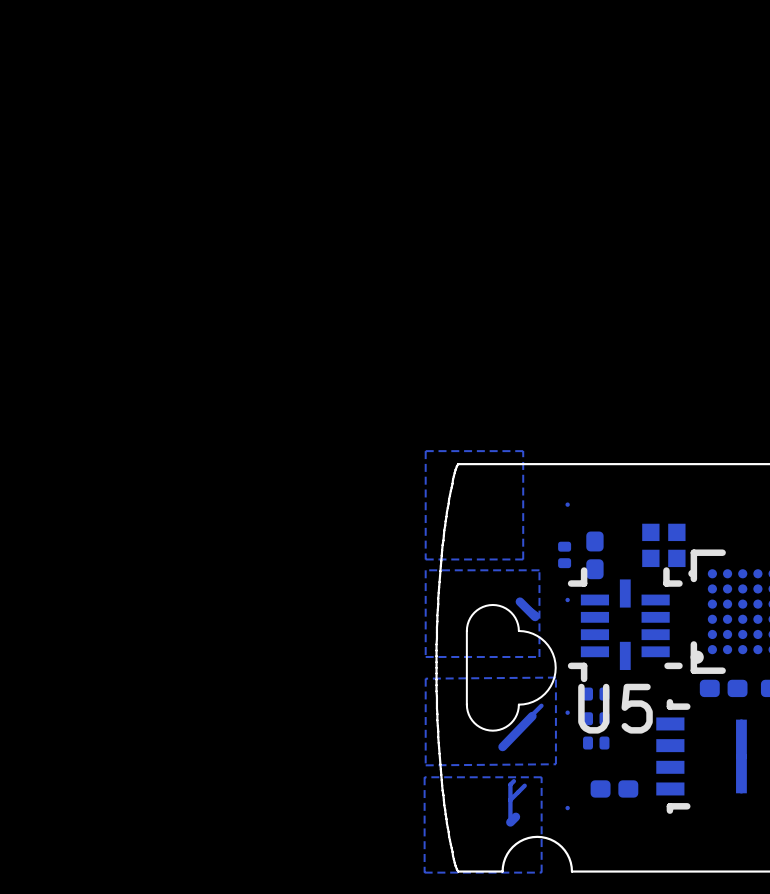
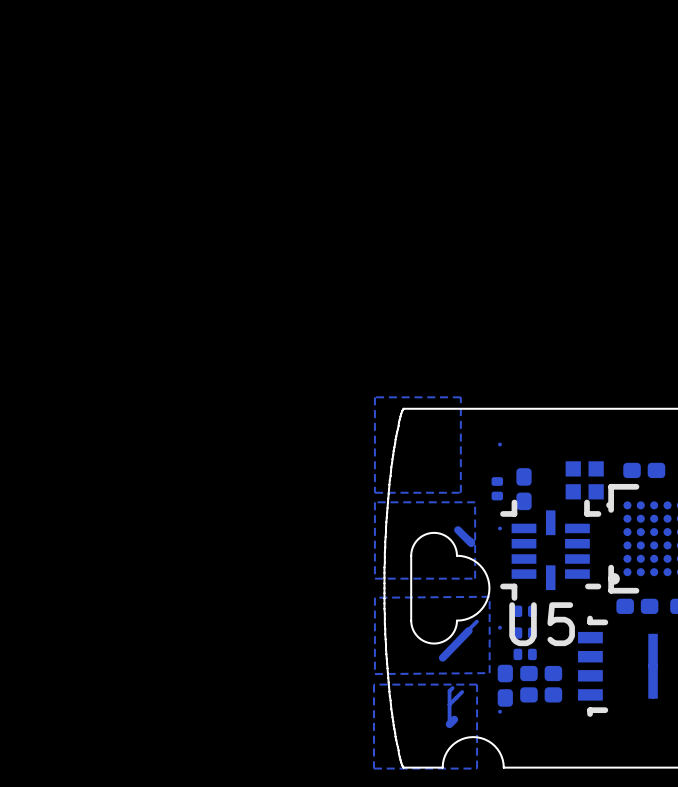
part: none -> (644, 470)
part: none -> (541, 673)
part: none -> (505, 685)

